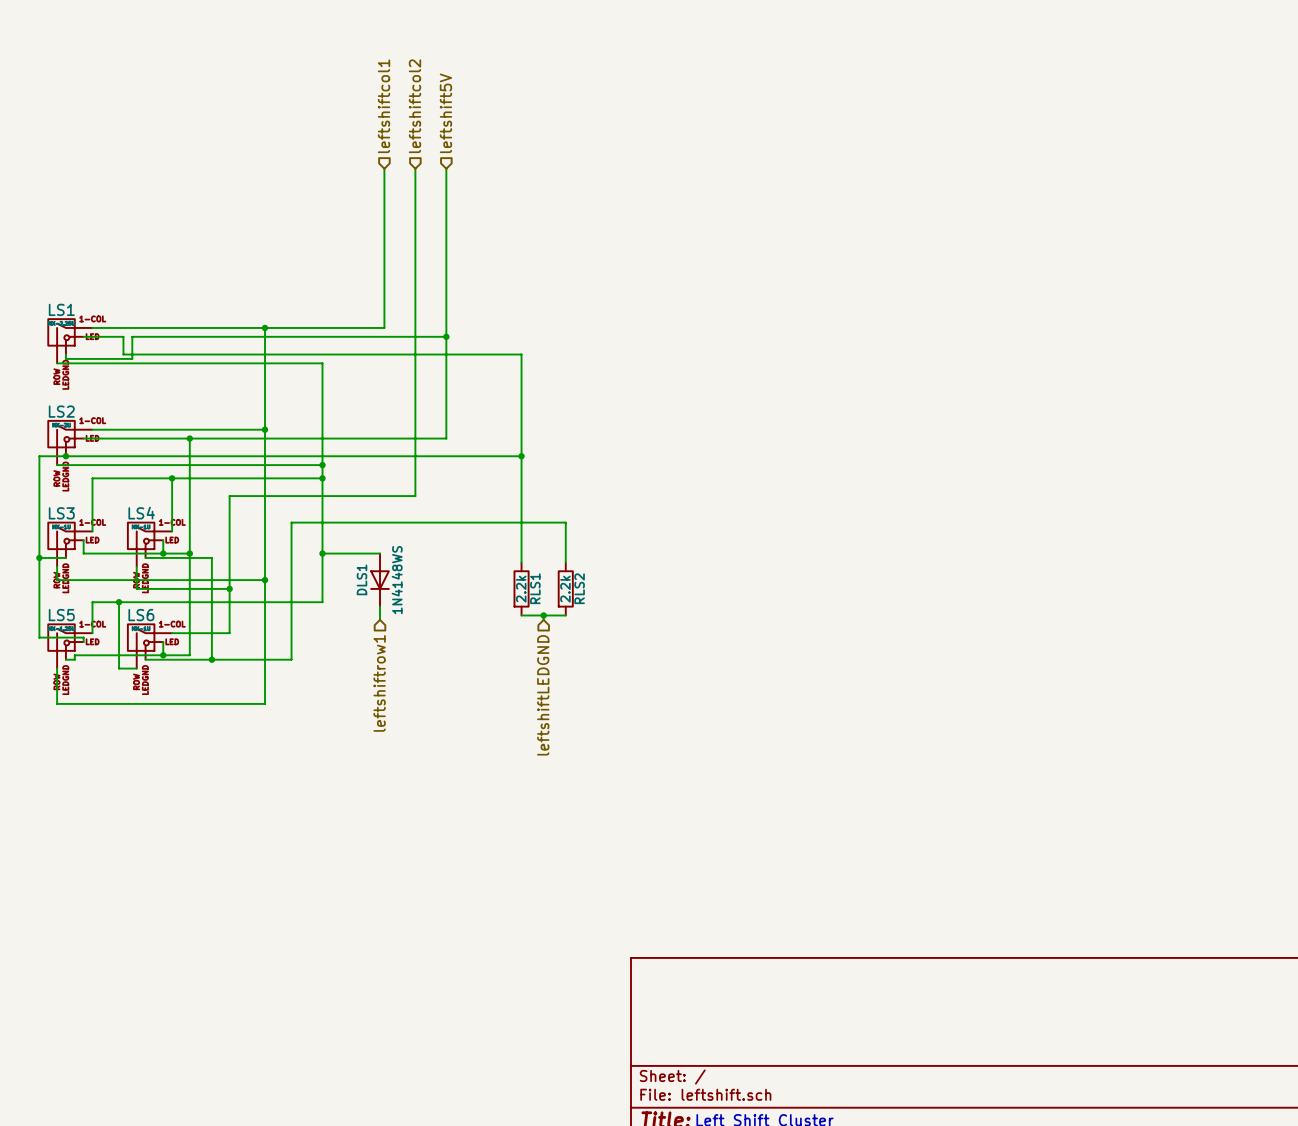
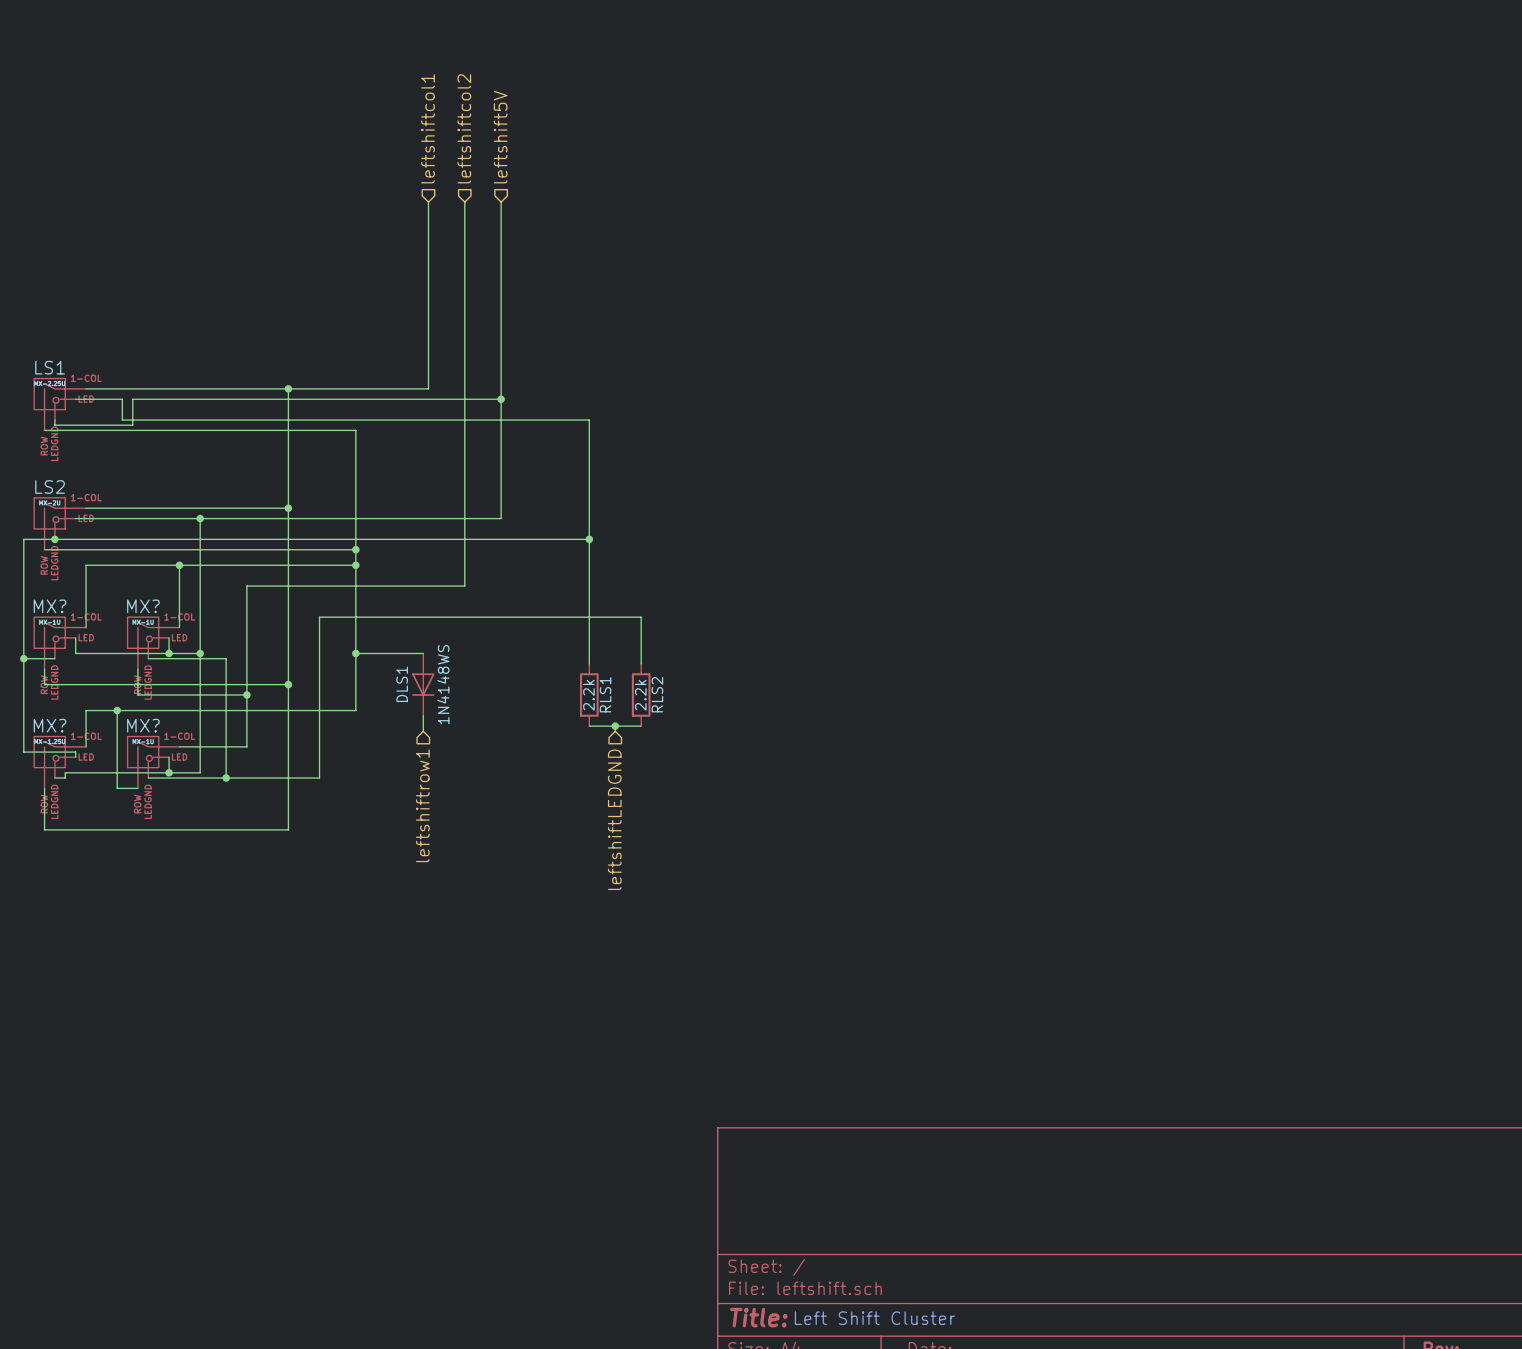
LS3 name: LS3 (61, 513) -> MX? (50, 606)
LS4 name: LS4 (141, 513) -> MX? (143, 606)
LS5 name: LS5 (61, 615) -> MX? (50, 725)
LS6 name: LS6 (141, 615) -> MX? (143, 725)

